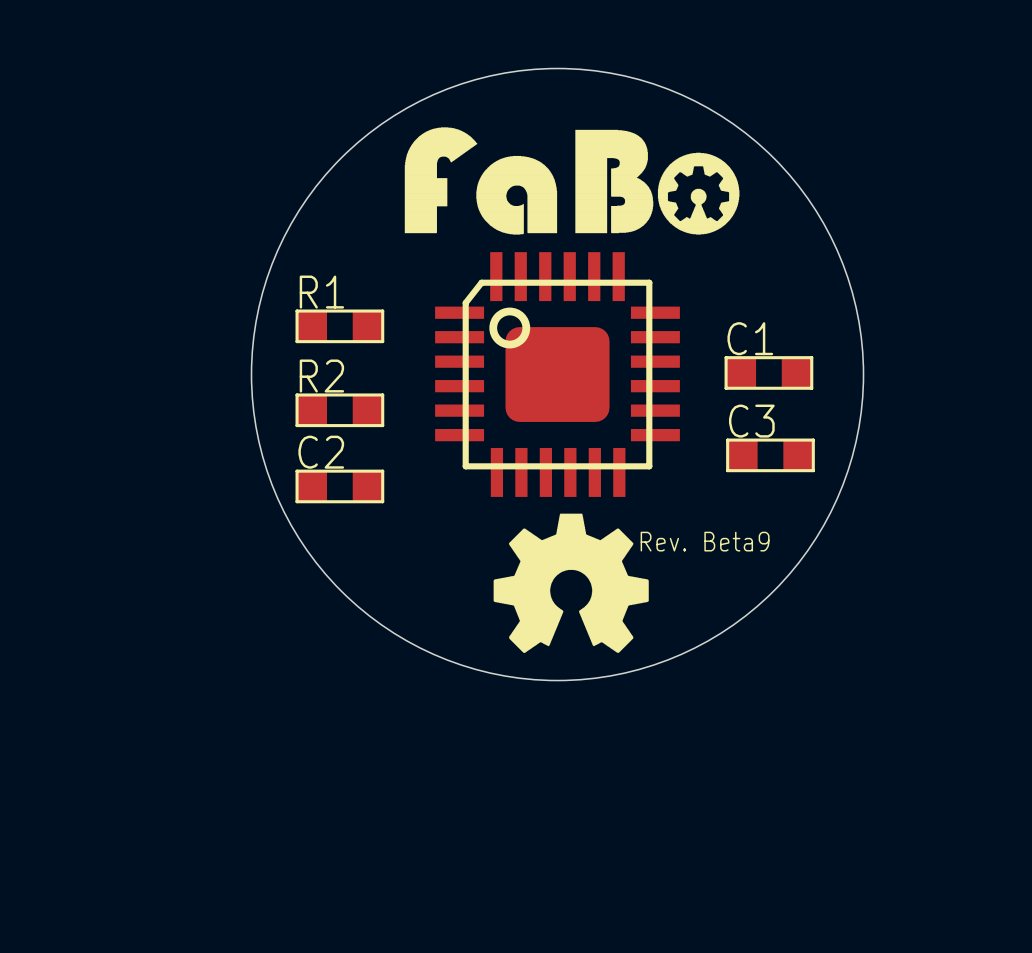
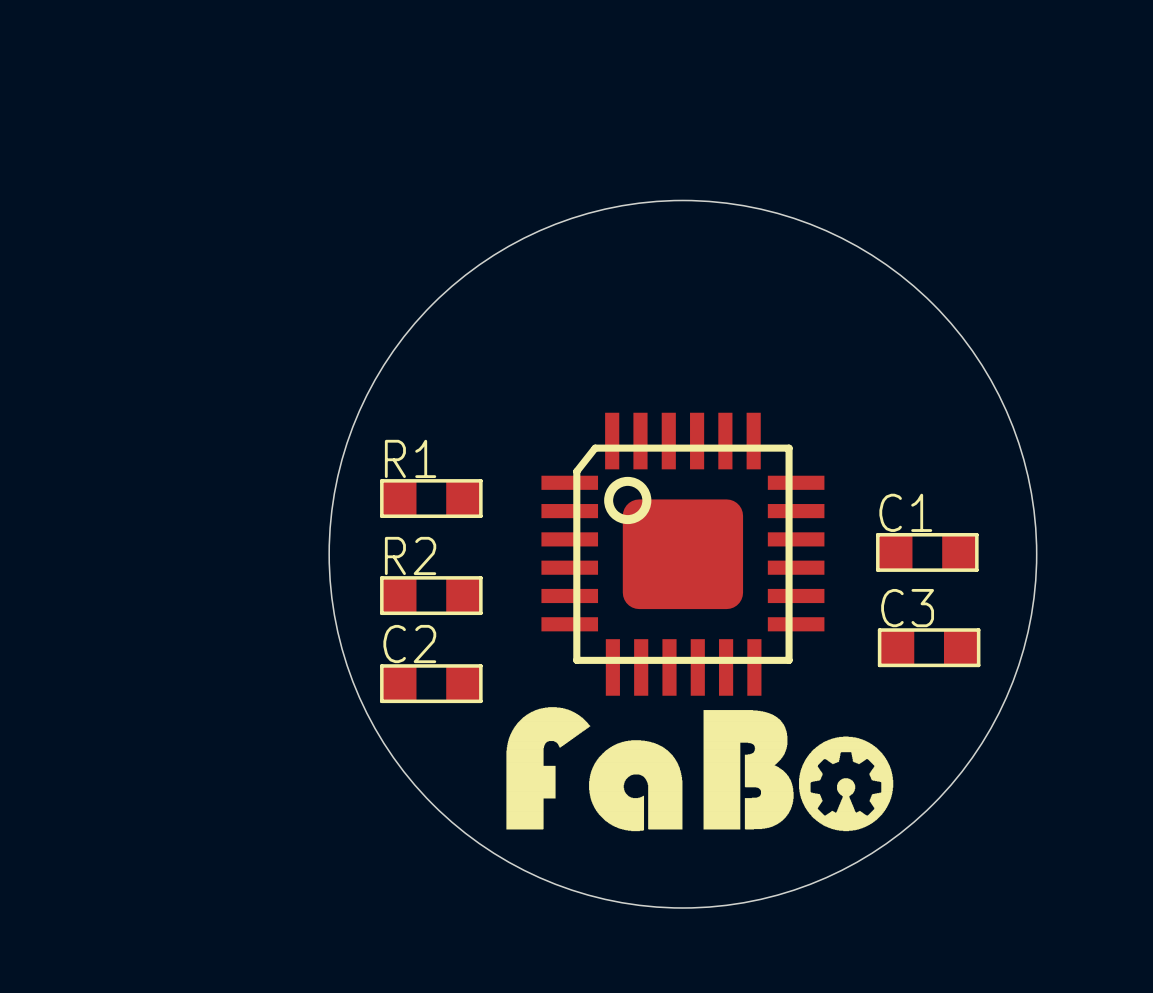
drawing position: (572, 180) -> (699, 769)
drawing: [493, 513, 649, 653] -> none
text: Rev. Beta9 (705, 541) -> none

